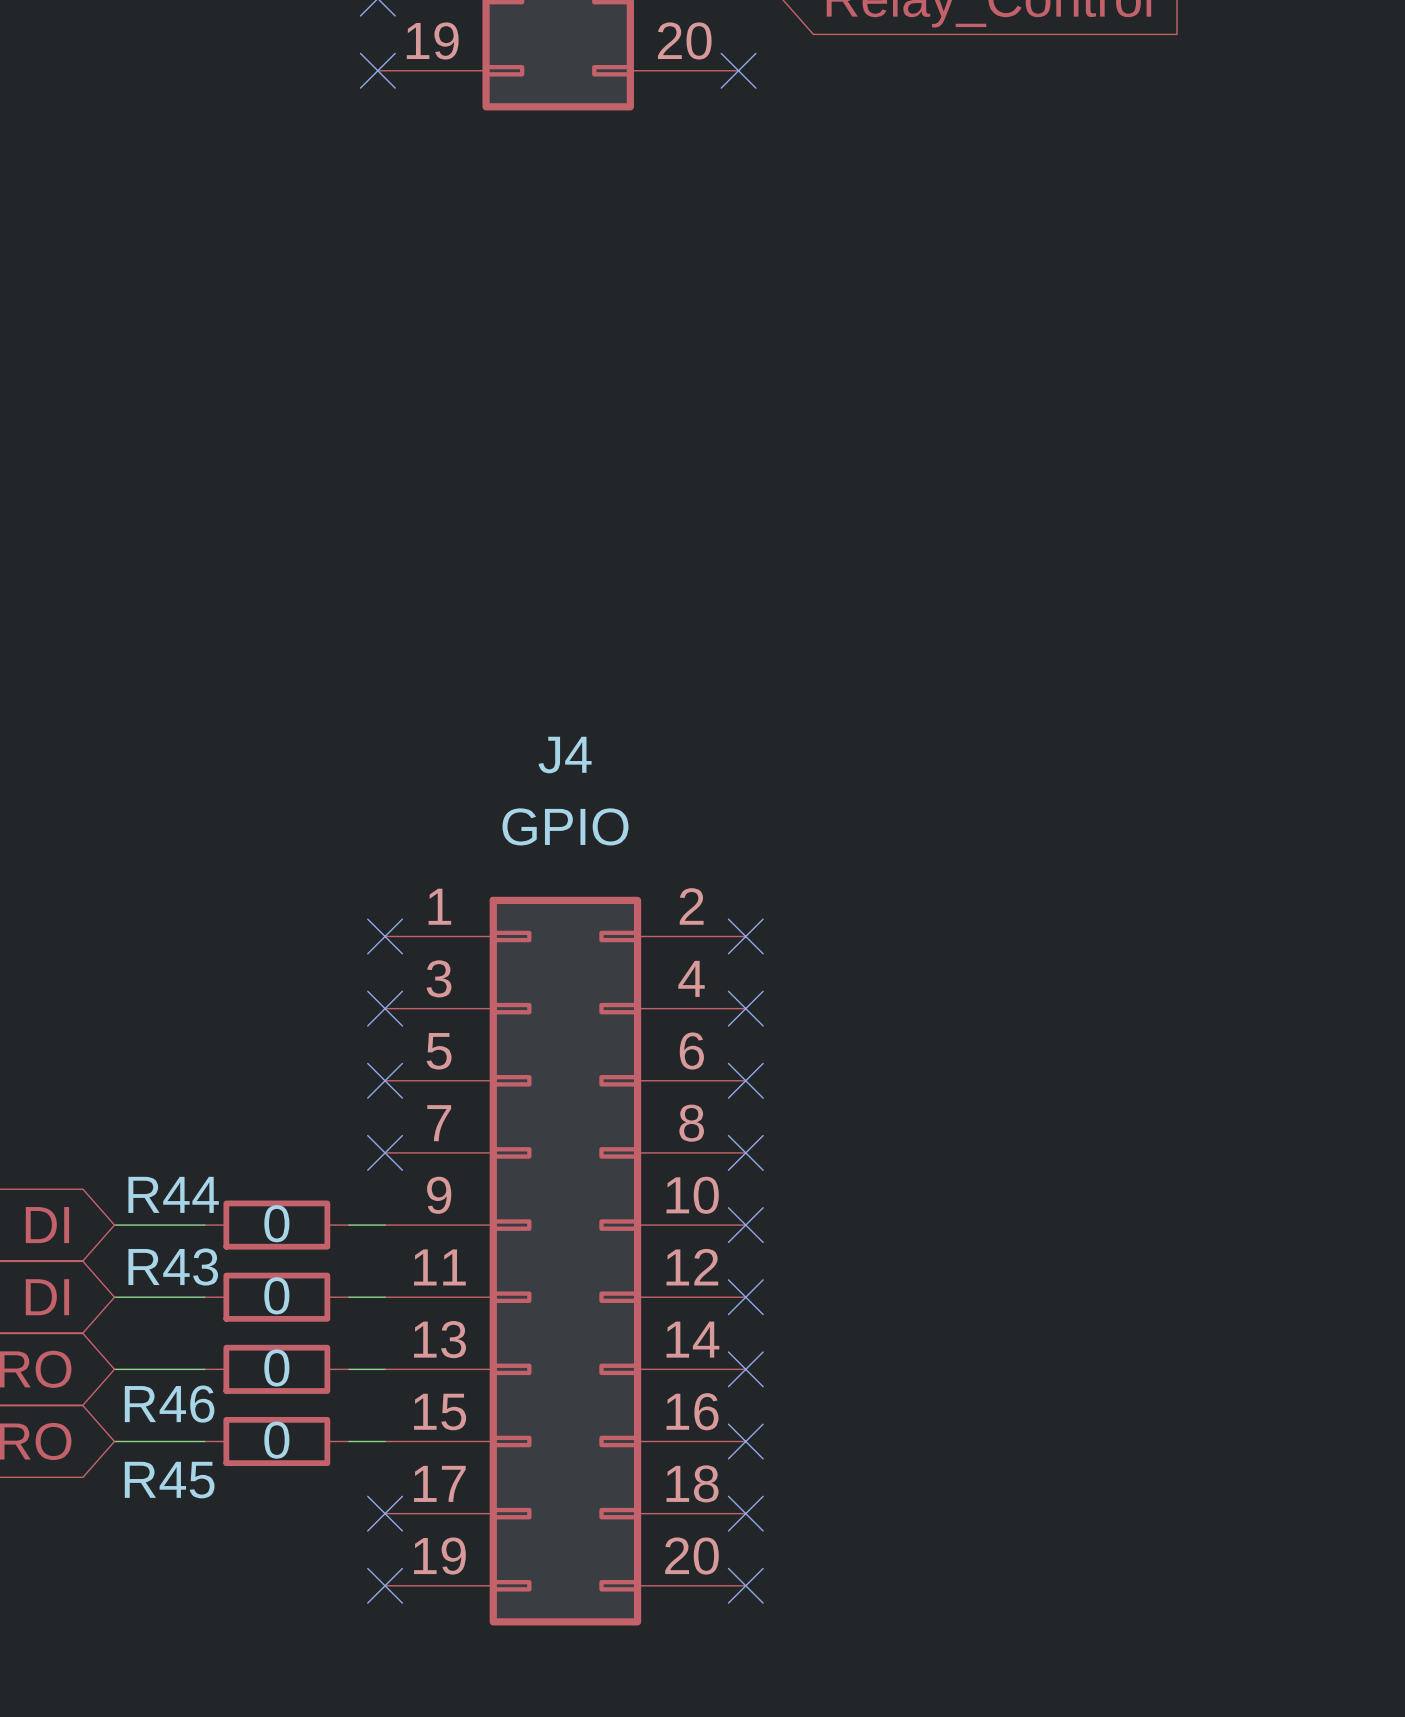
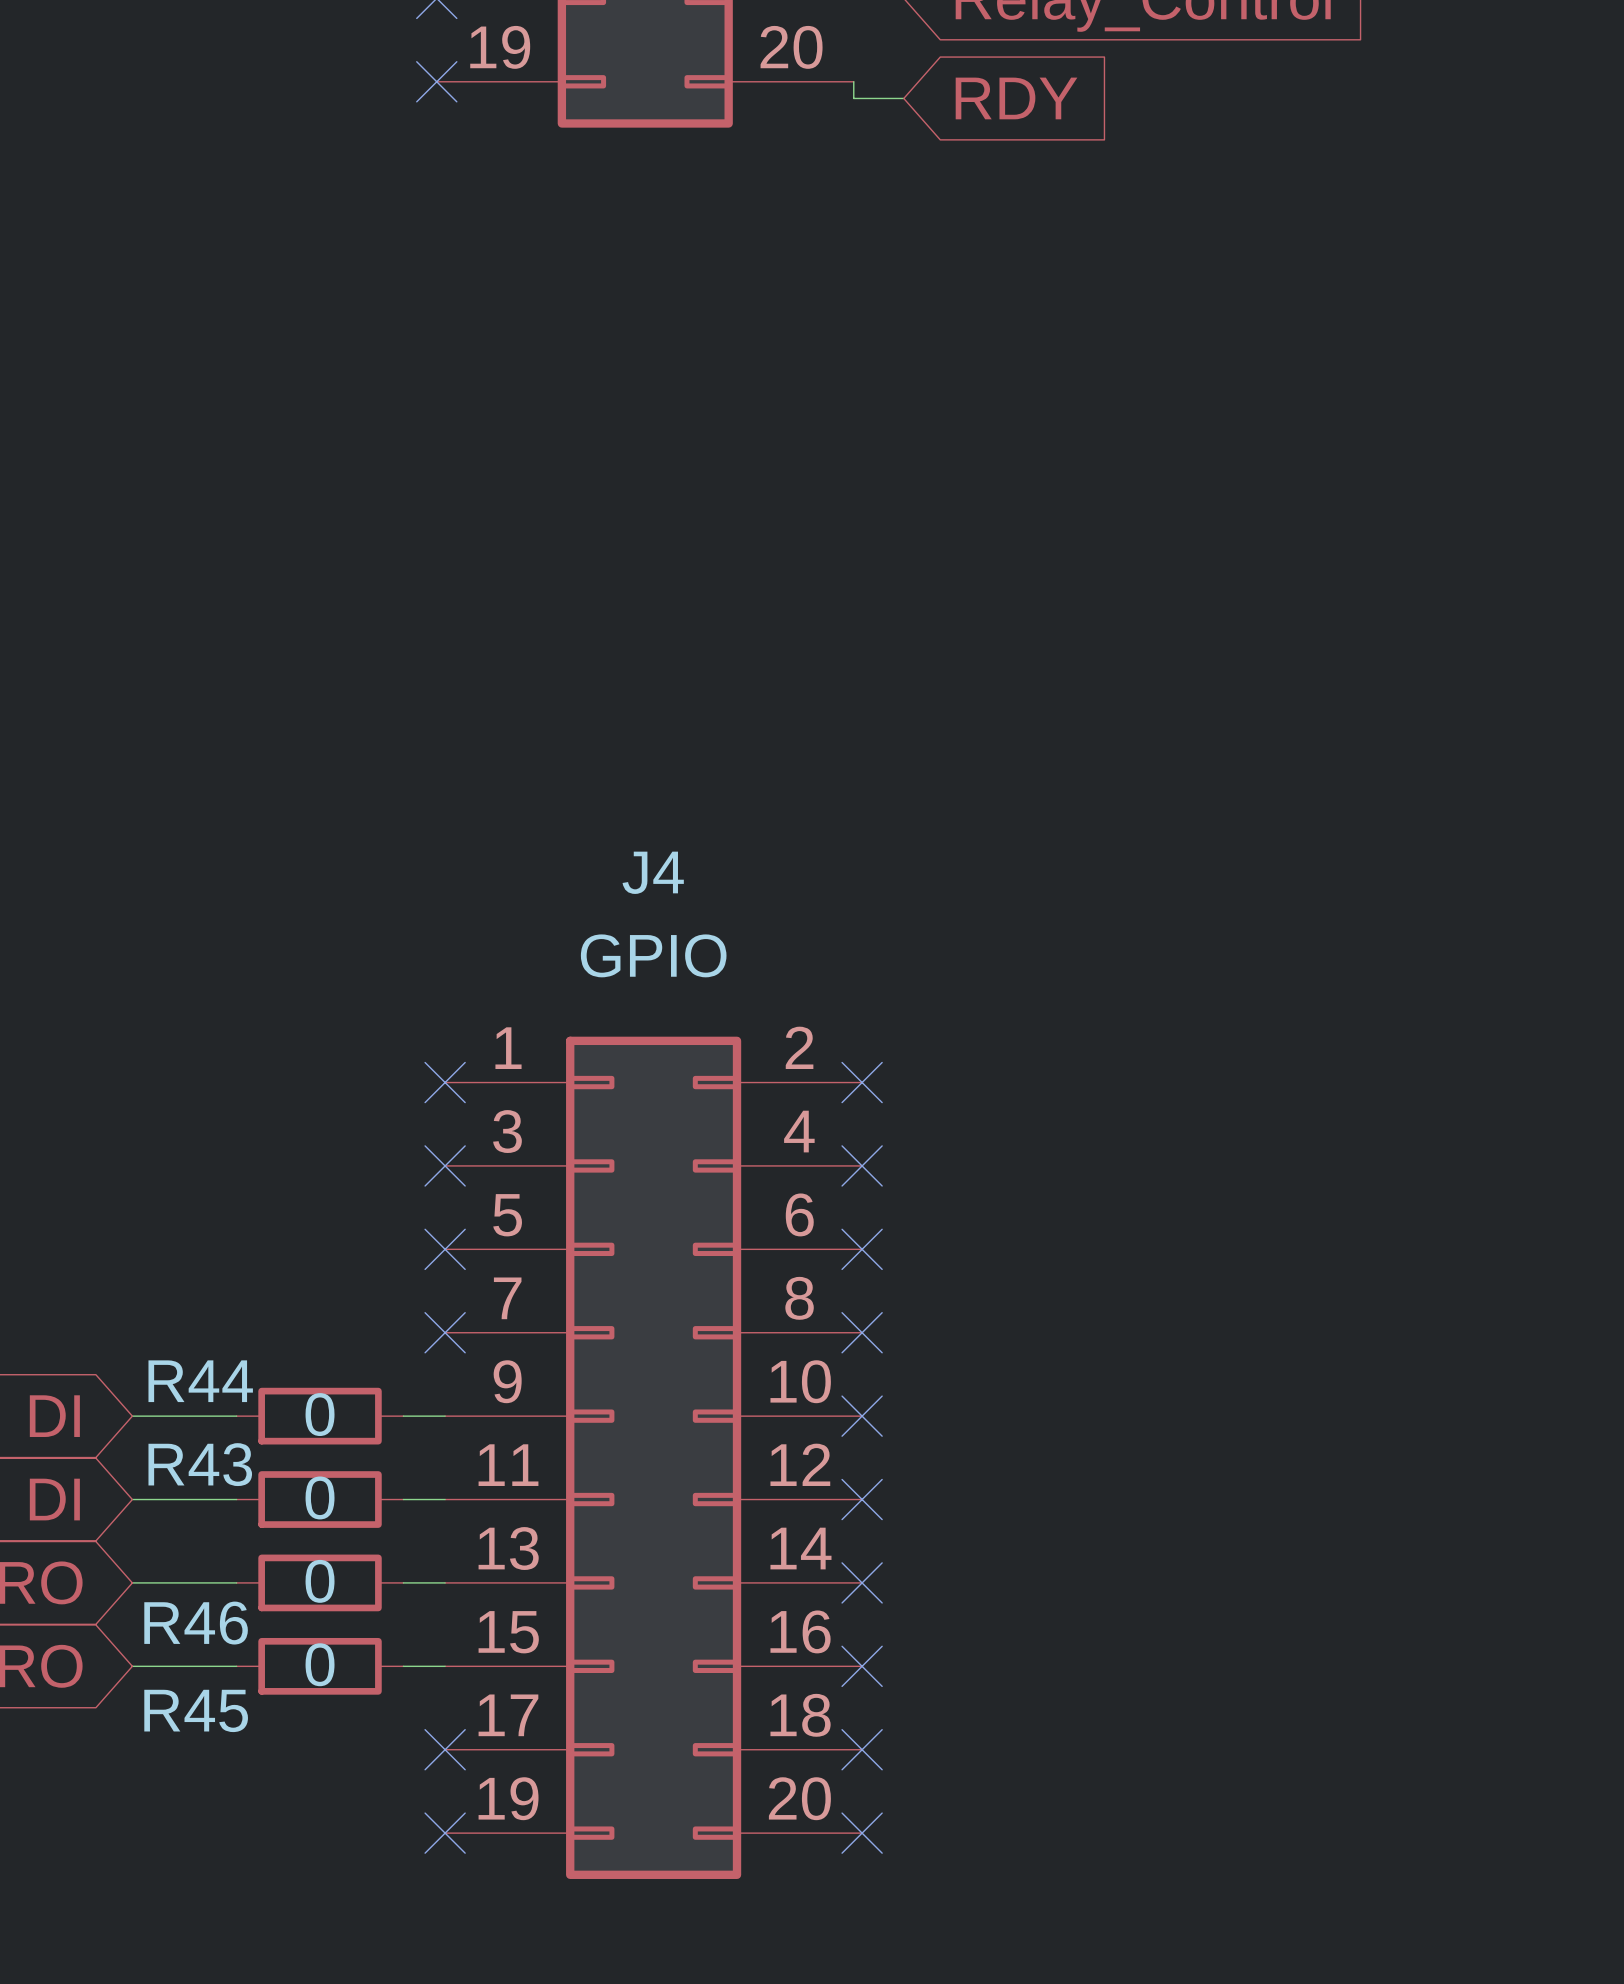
wire: none -> (853, 81) (853, 98) (903, 98)
no-connect mark: (738, 70) -> none
global label: none -> RDY (1016, 98)

